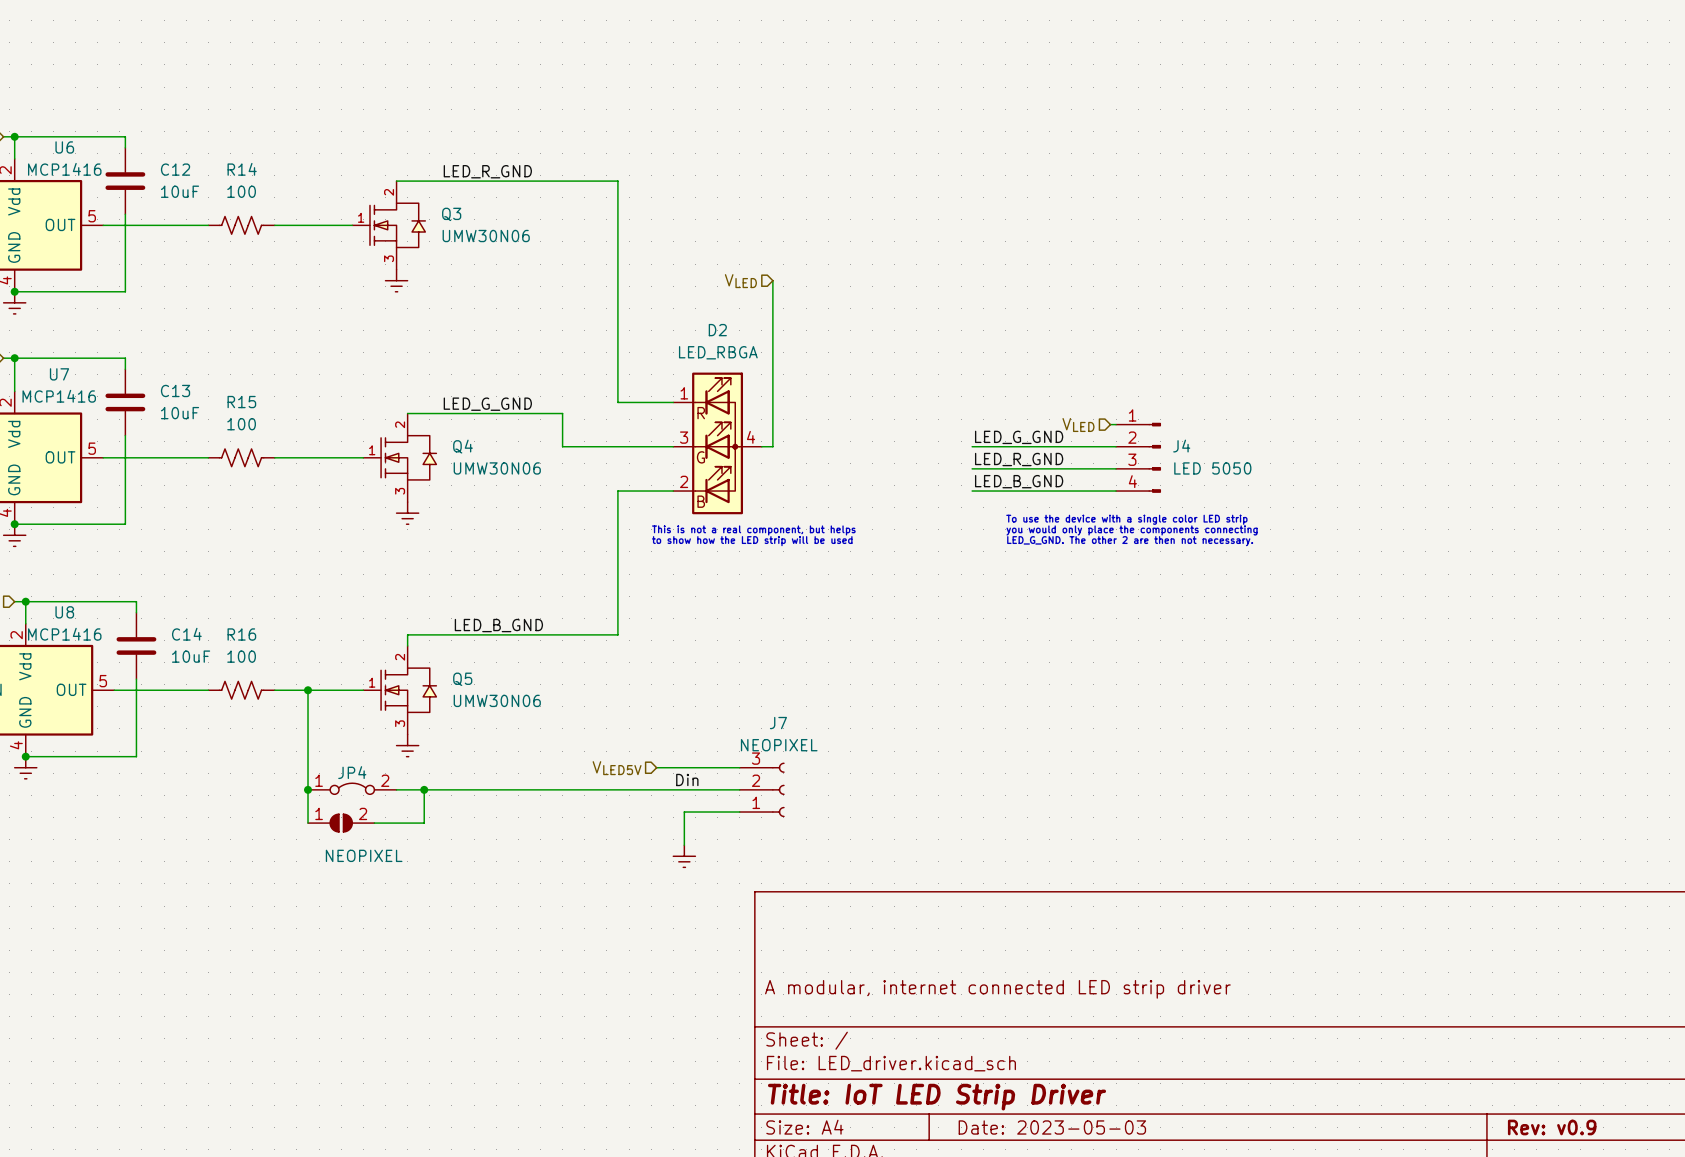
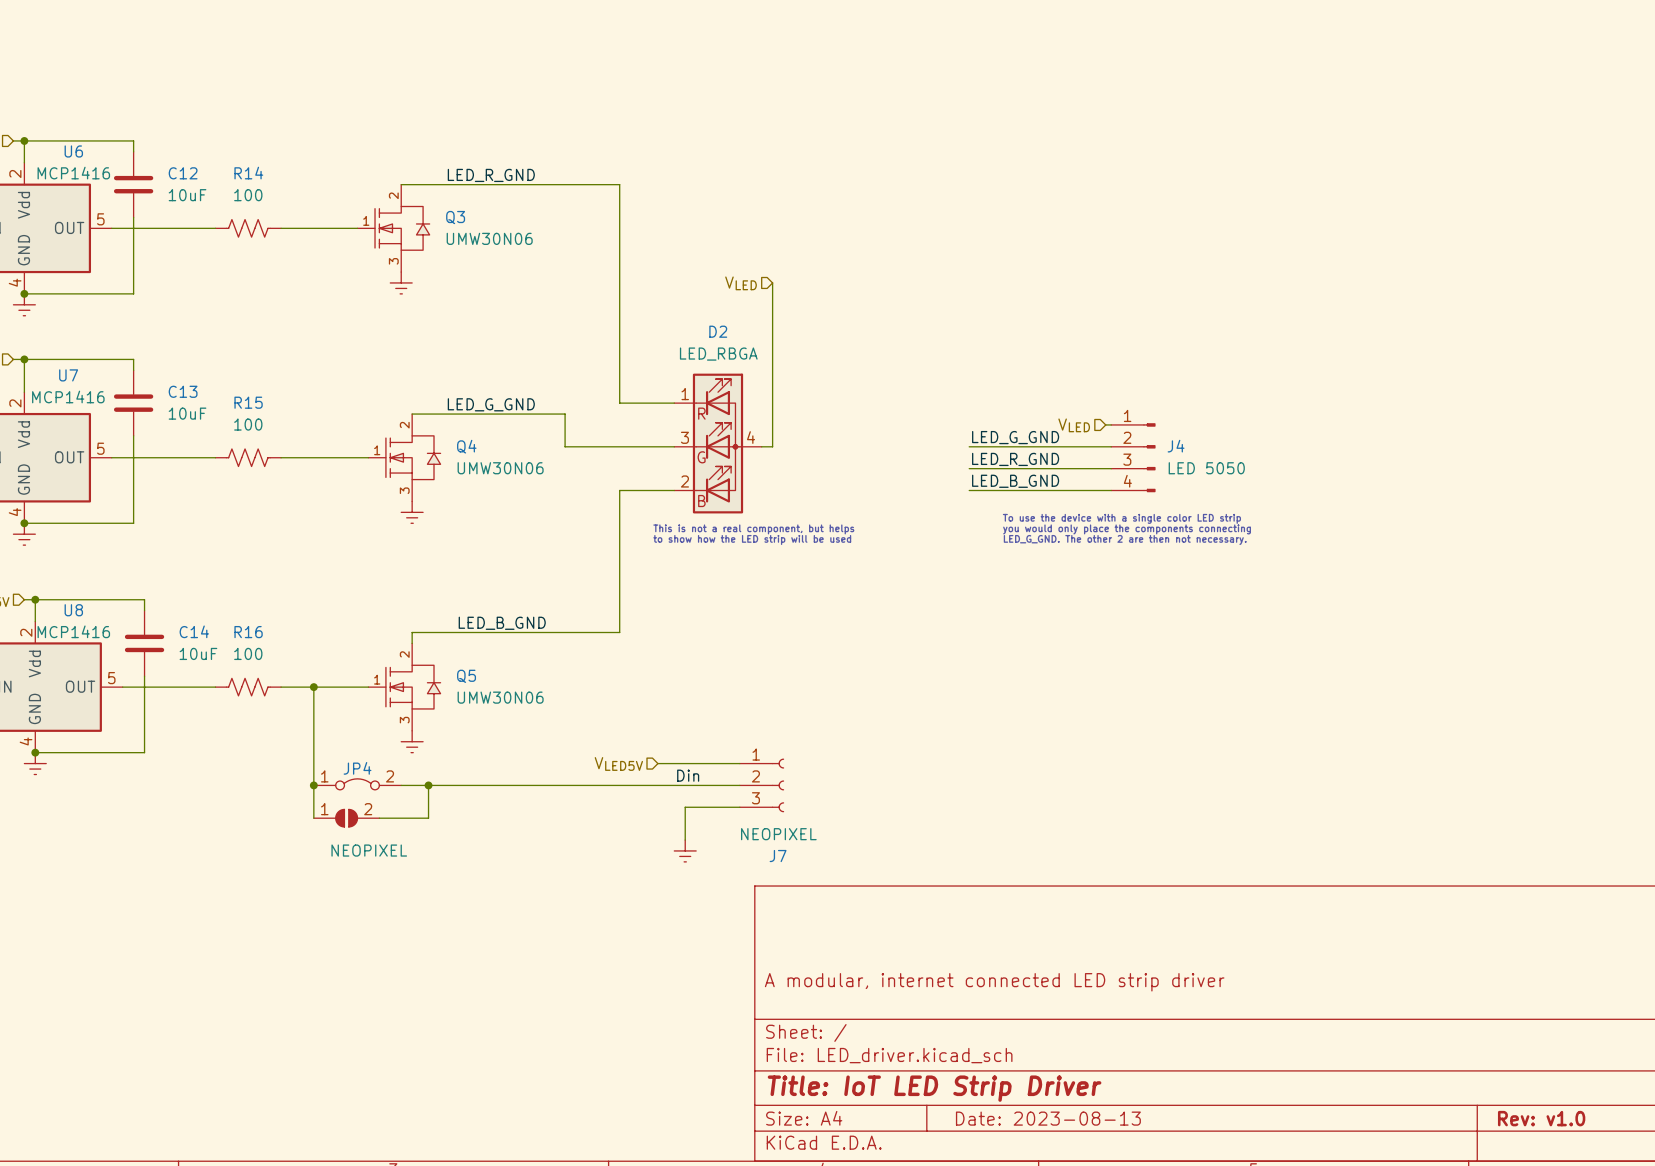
J7 flip: as is (778, 789) -> up-down (778, 785)
title block: Date: 2023-05-03 (1052, 1127) -> Date: 2023-08-13 (1048, 1118)
title block: Rev: v0.9 (1552, 1127) -> Rev: v1.0 (1541, 1118)

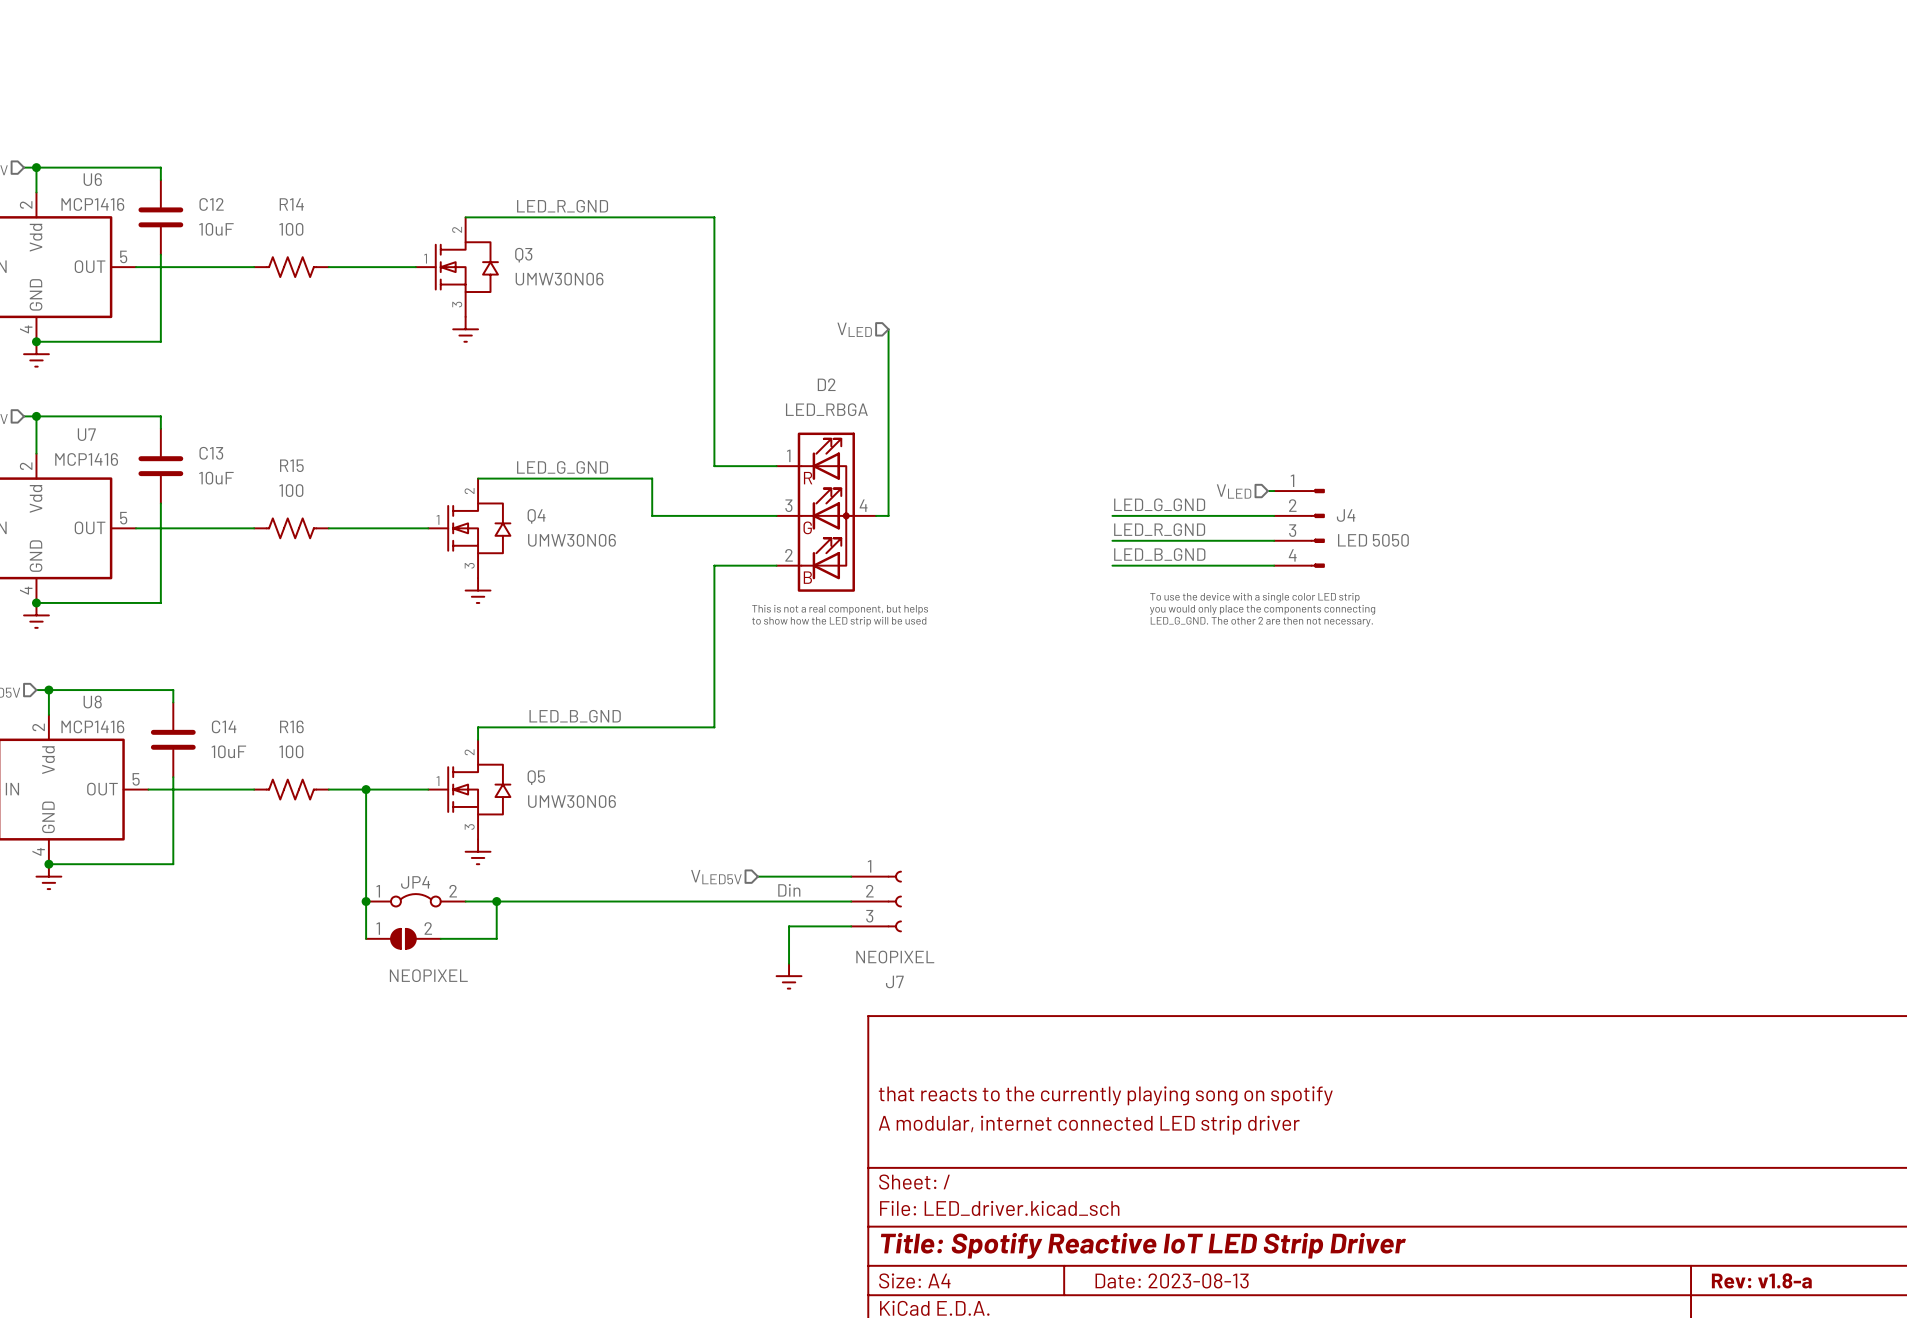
title block: none -> that reacts to the currently playing song on spotify (1105, 1095)
title block: Title: IoT LED Strip Driver (934, 1088) -> Title: Spotify Reactive IoT LED Strip Driver (1143, 1245)
title block: Rev: v1.0 (1541, 1118) -> Rev: v1.8-a (1761, 1280)

